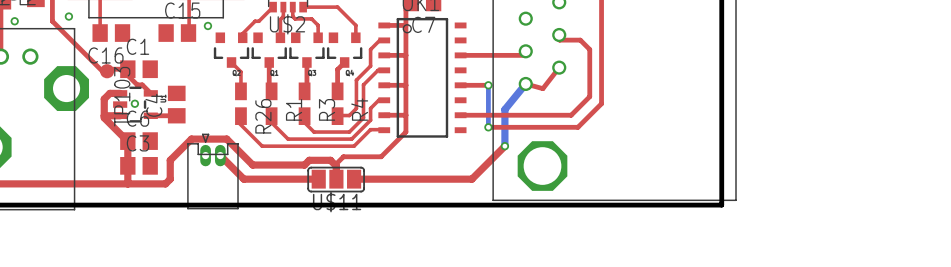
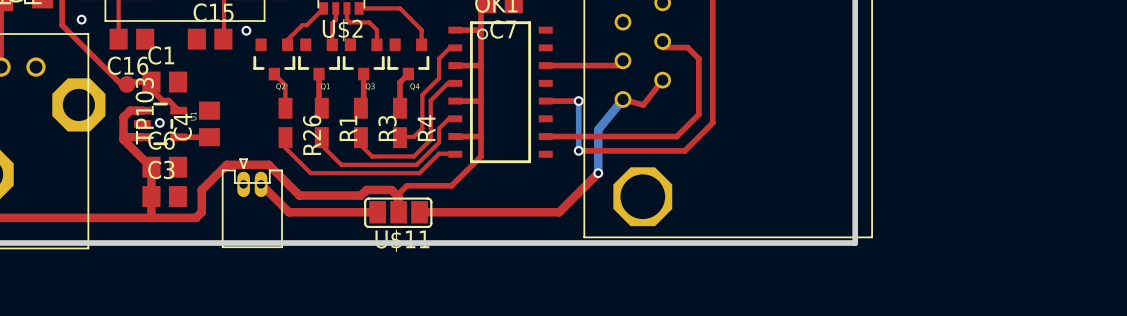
via: (14, 21) -> none

